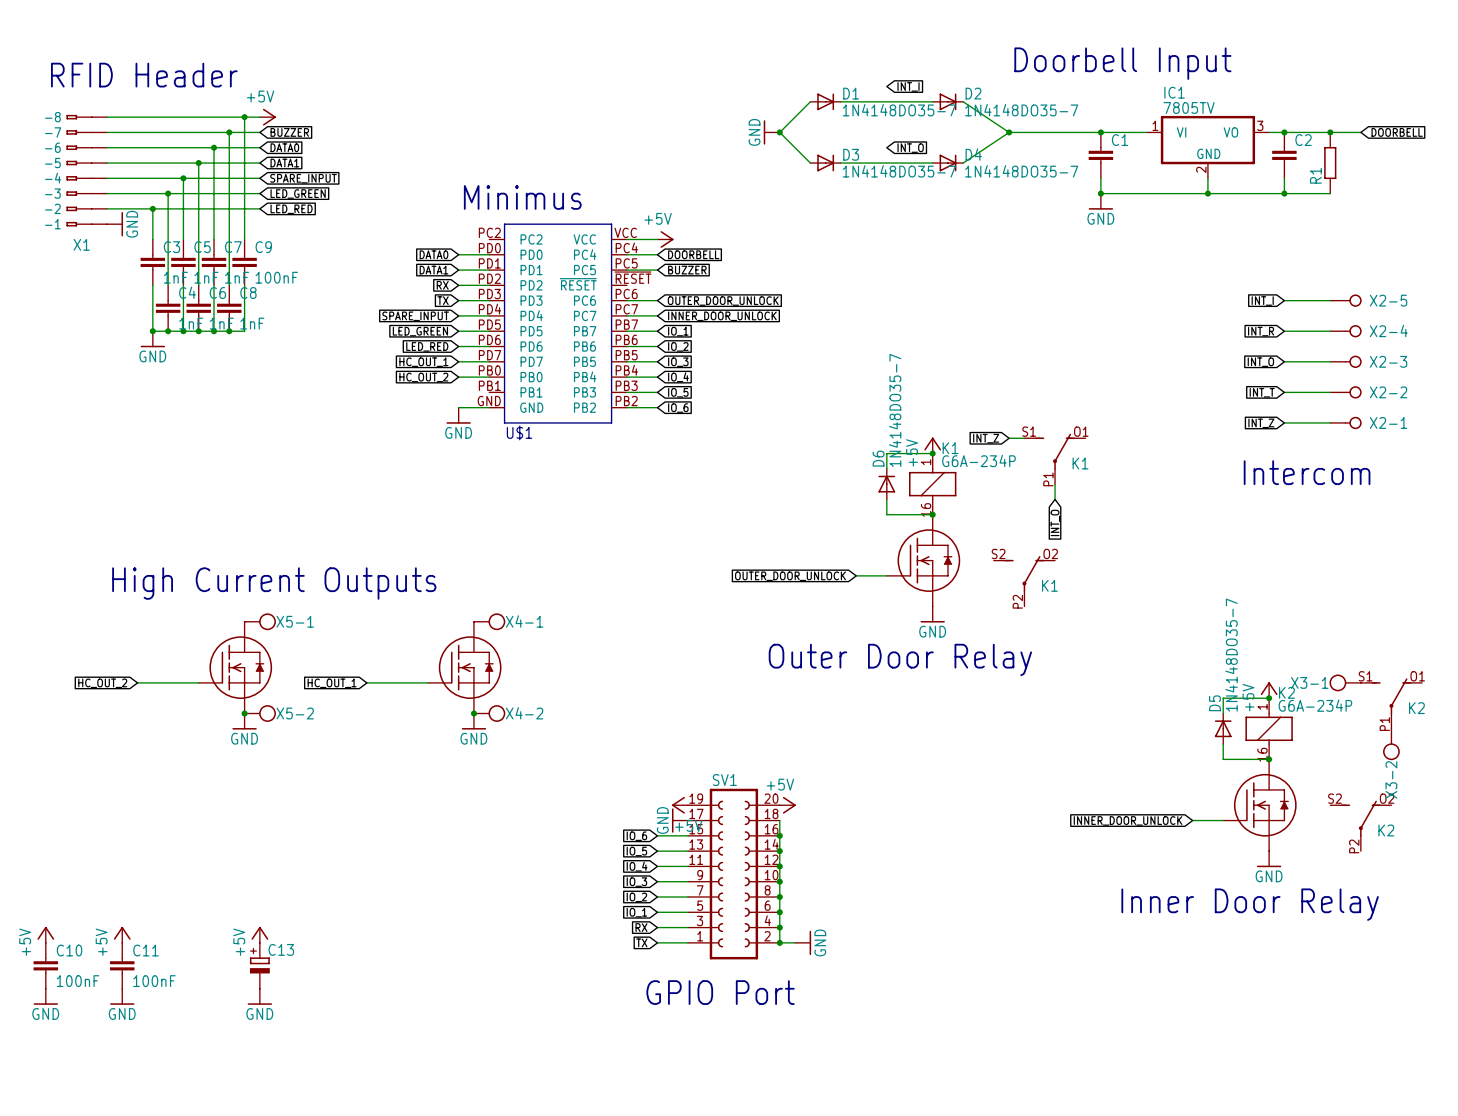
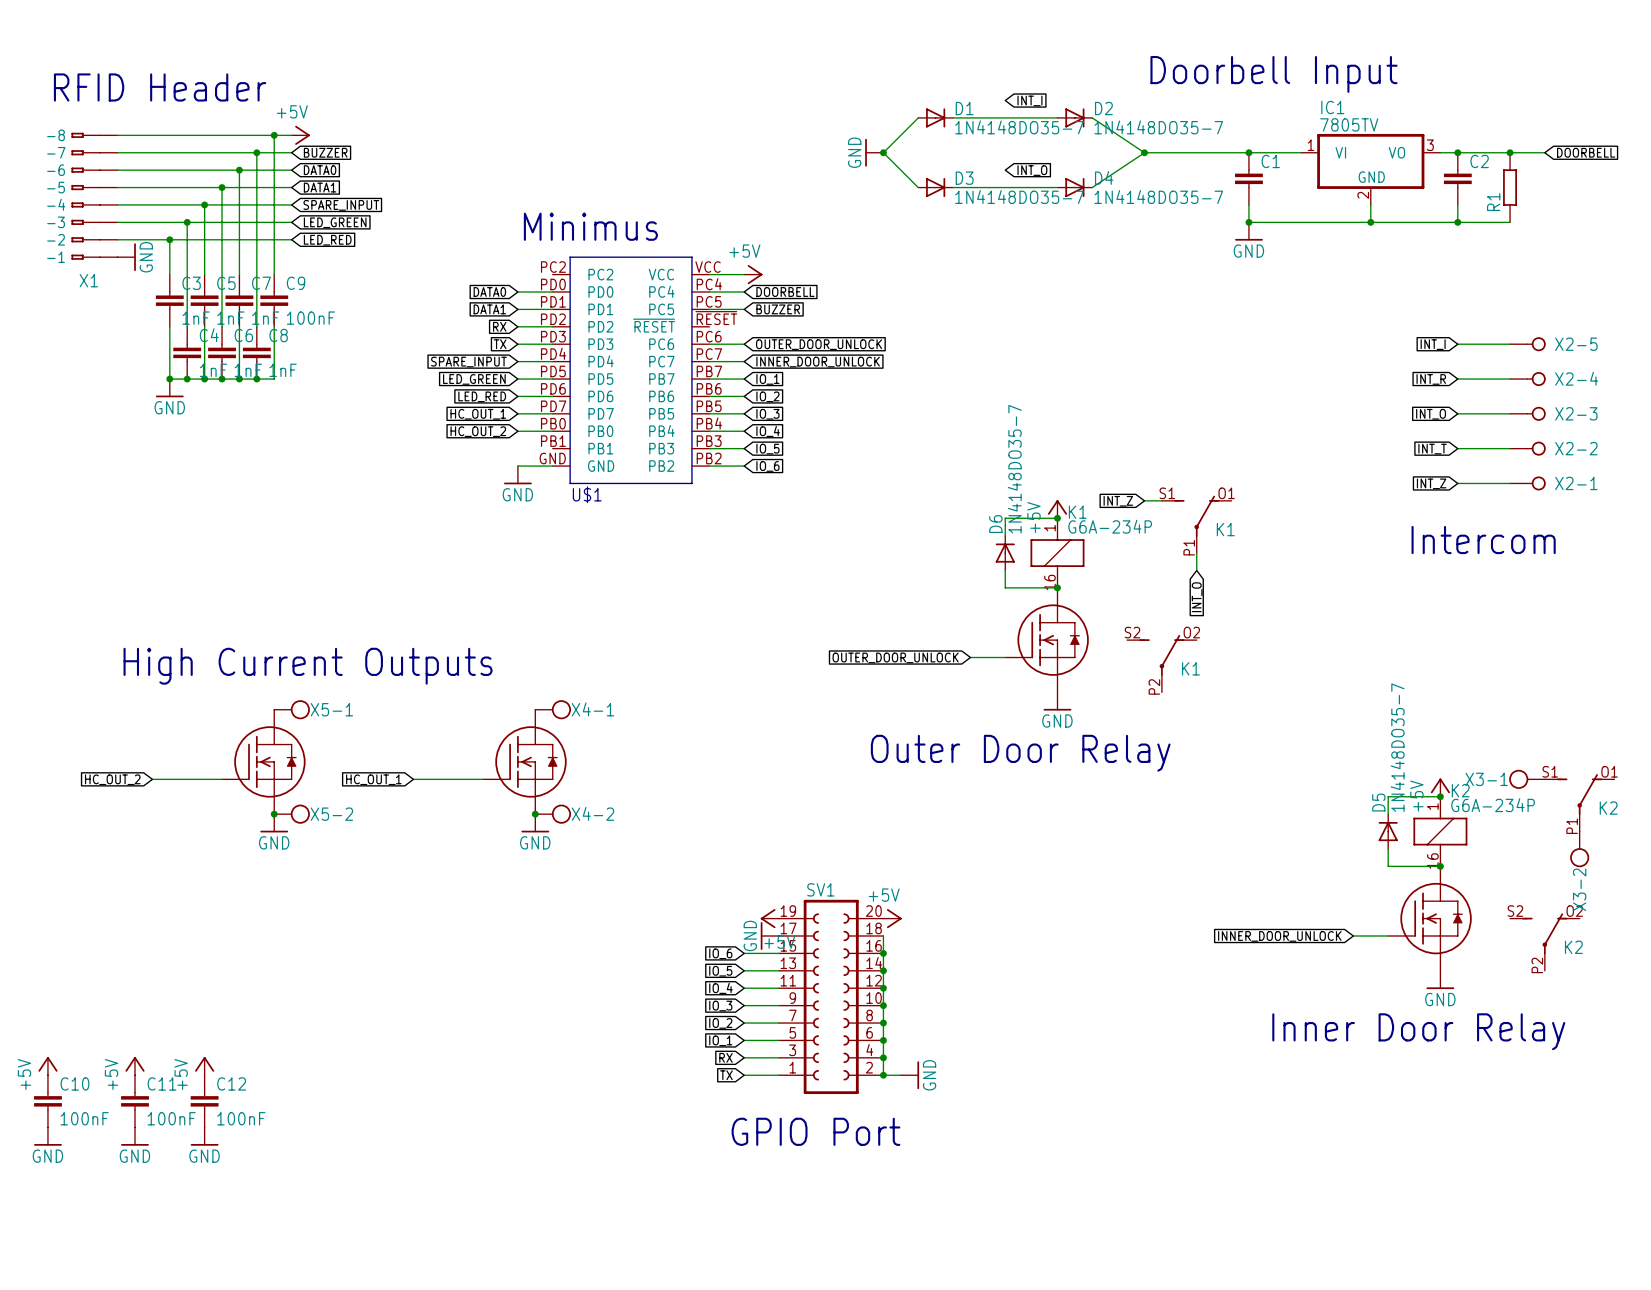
power symbol position: +5V (259, 934) -> +5V (204, 1066)
C12: none -> 100nF (204, 1101)
C13: (259, 965) -> none
power symbol position: GND (259, 996) -> GND (204, 1136)

